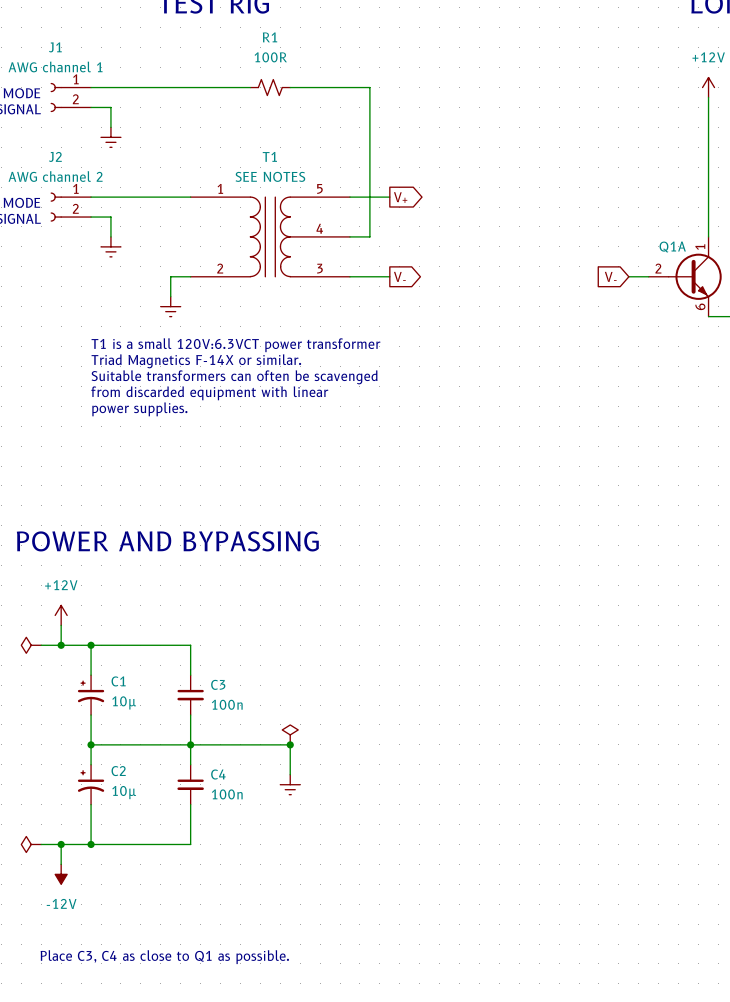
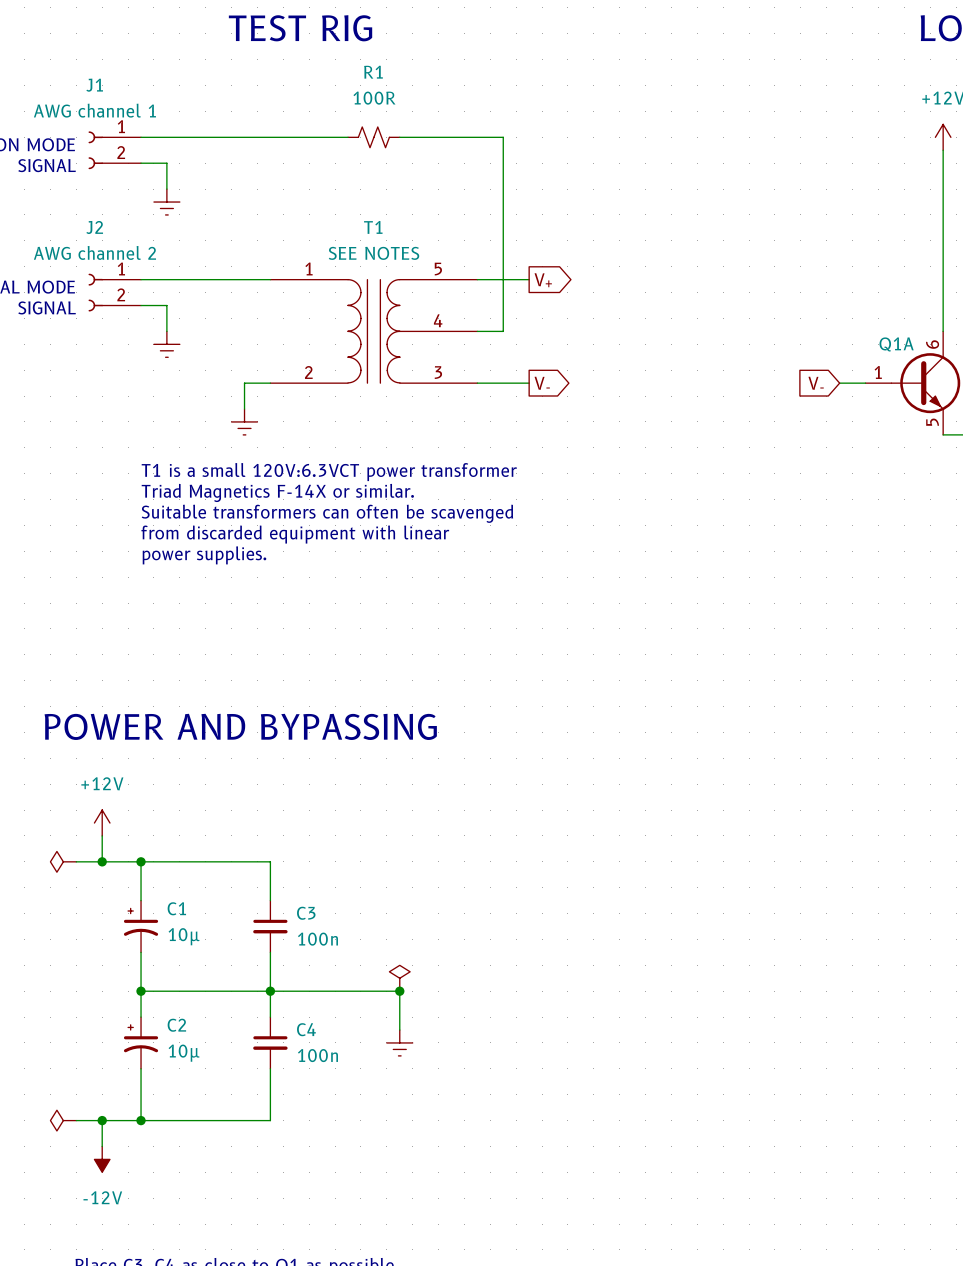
Q1A pin number: 1 (700, 247) -> 6 (932, 344)
Q1A pin number: 2 (658, 268) -> 1 (878, 372)
Q1A pin number: 6 (700, 306) -> 5 (932, 422)

